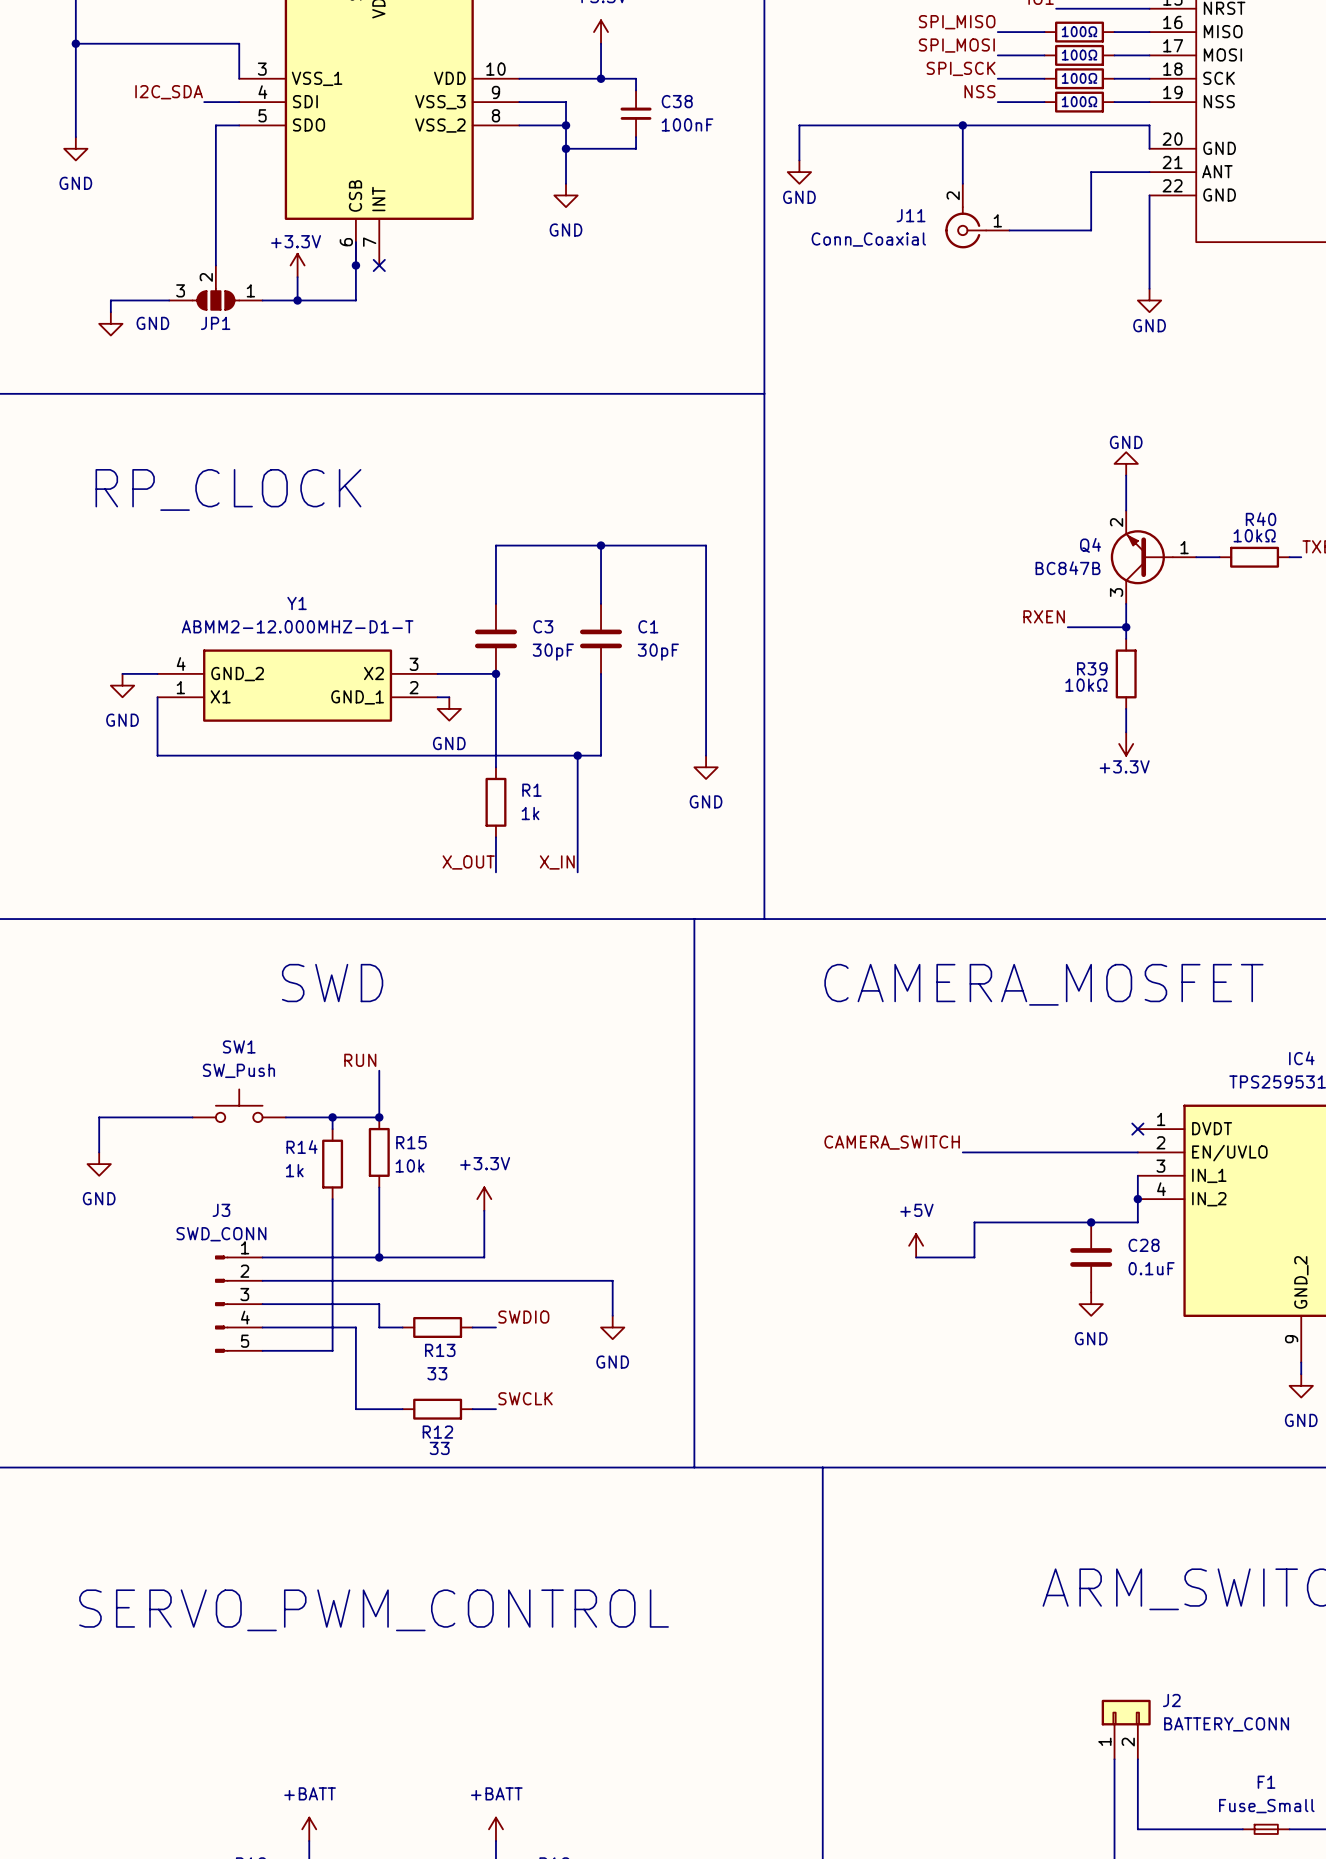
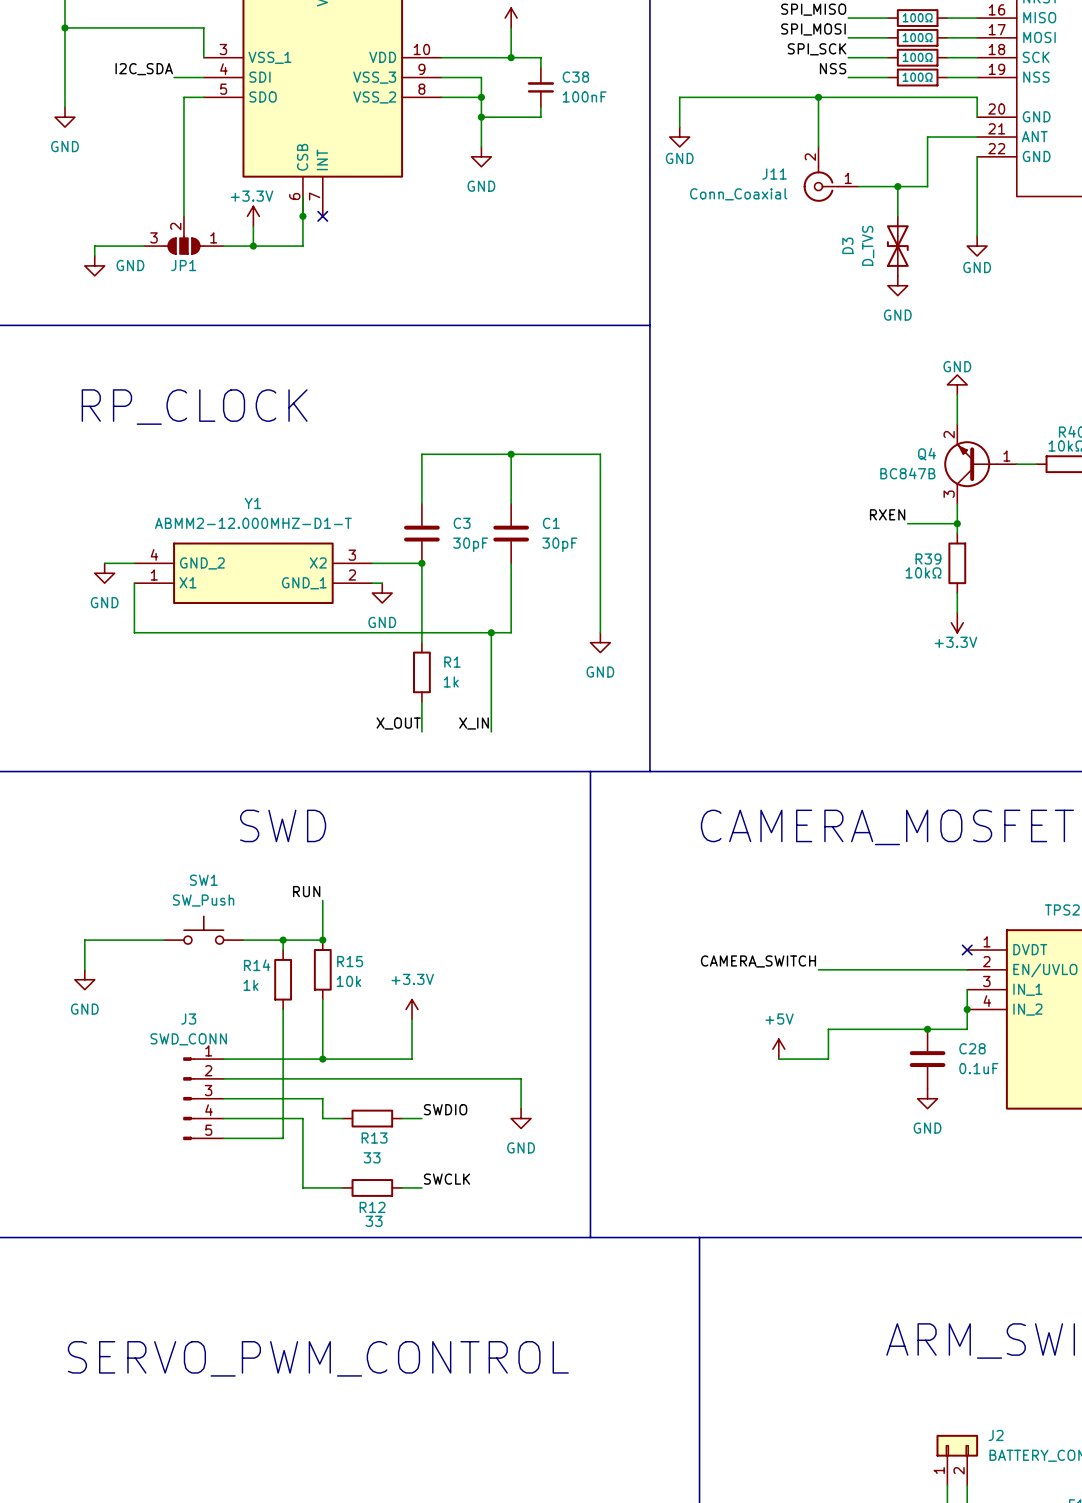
wire: none -> (897, 186) (897, 216)
junction: none -> (897, 186)
D3: none -> D_TVS (897, 246)
power symbol: none -> GND (897, 285)

